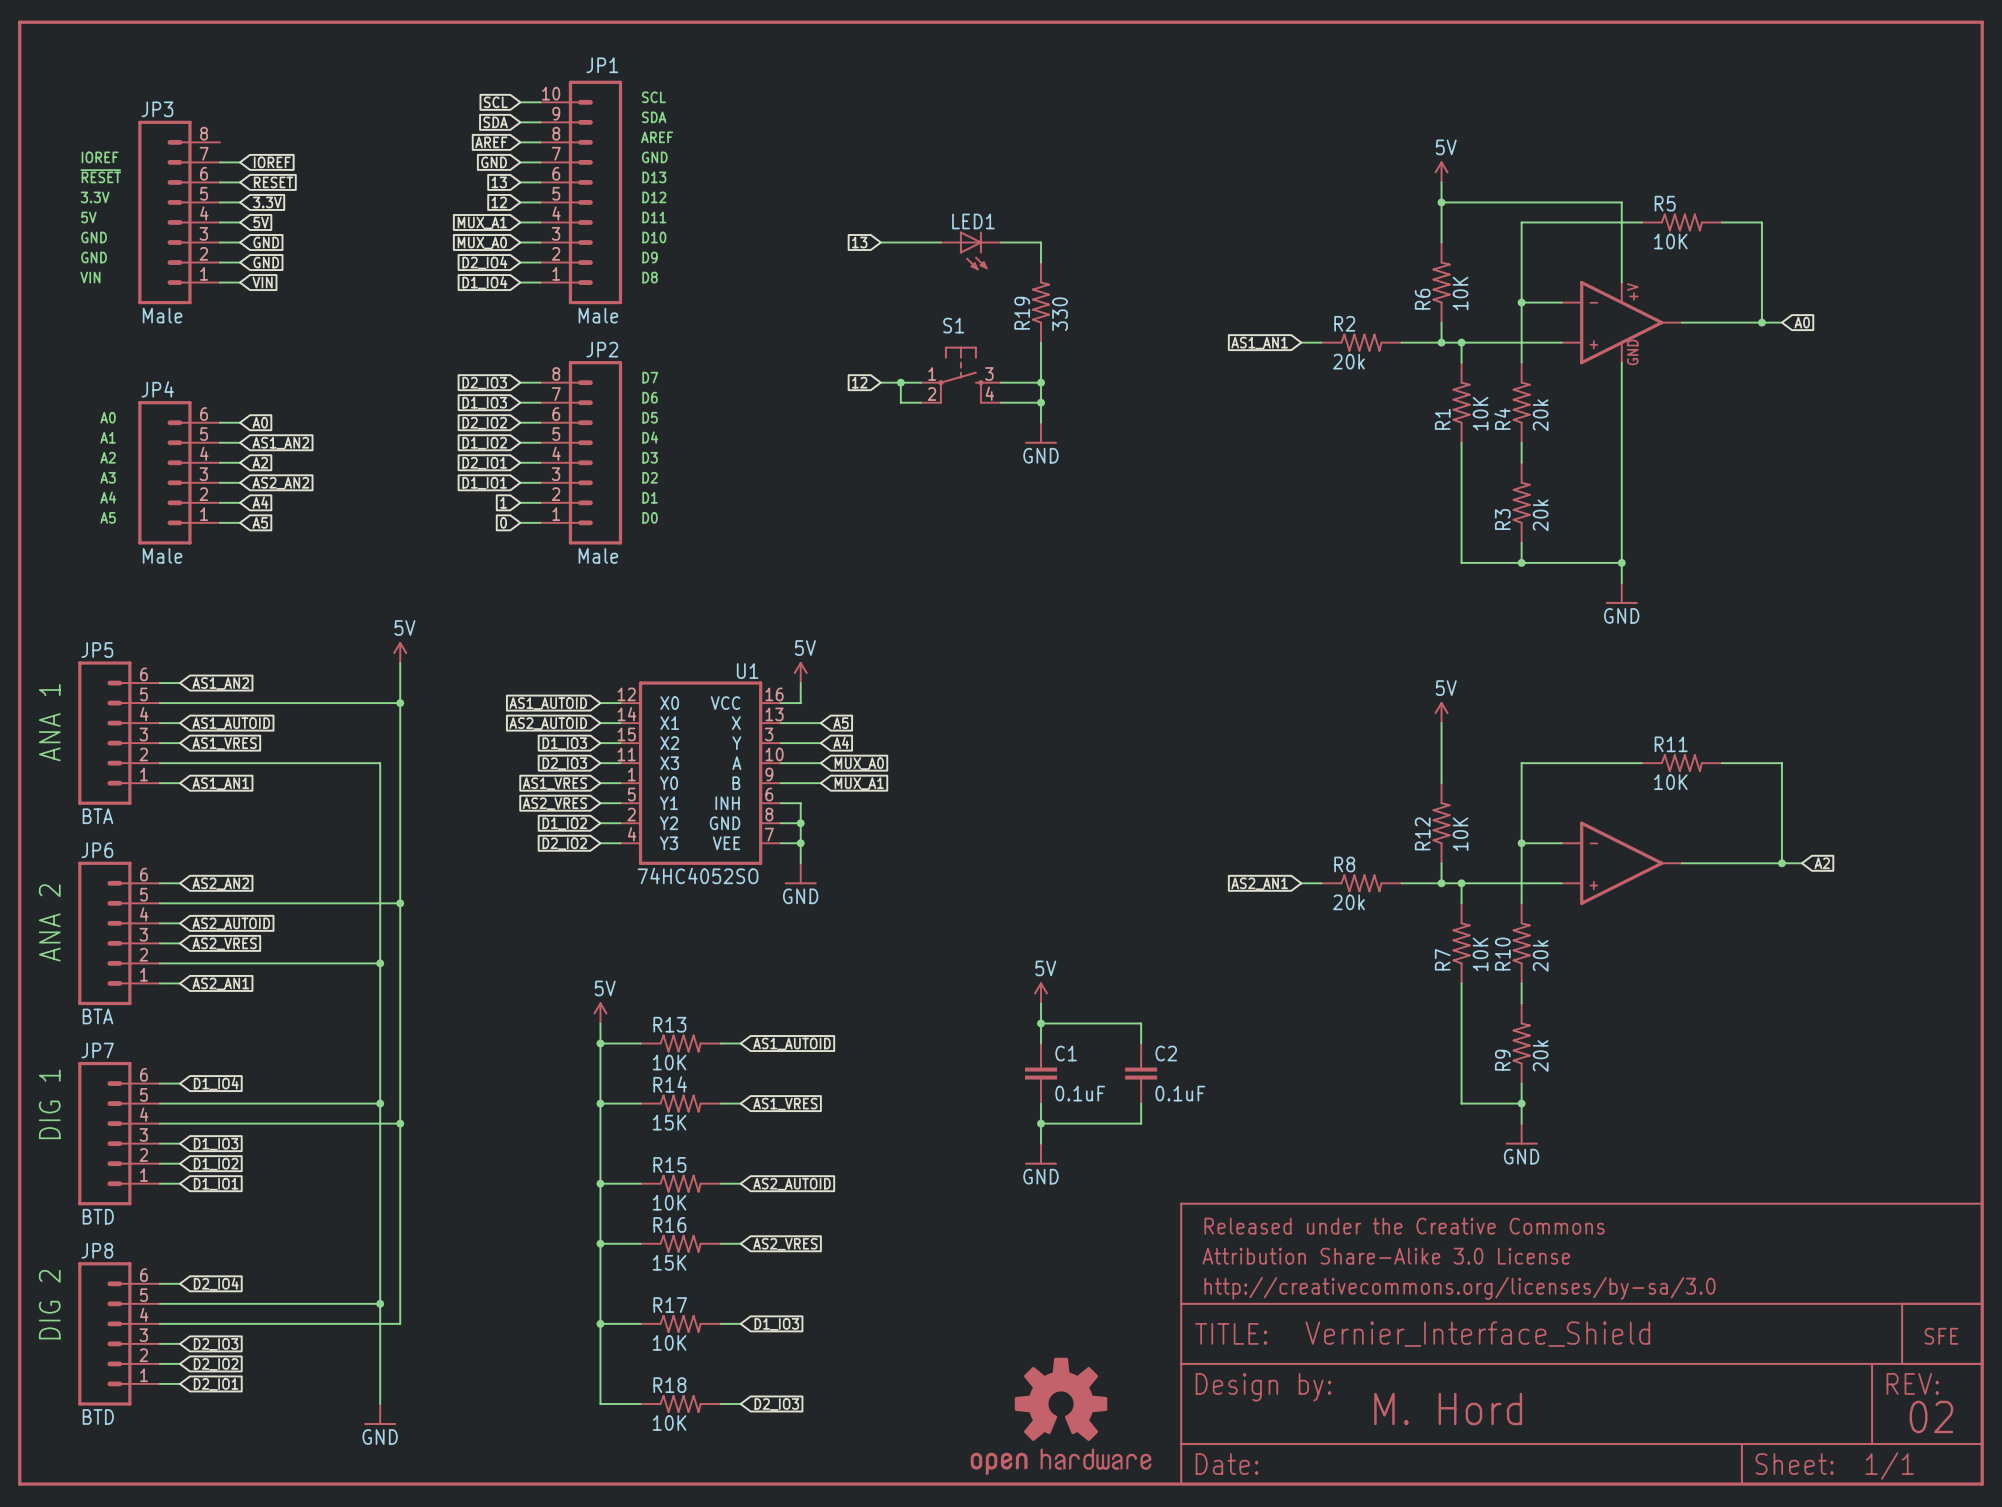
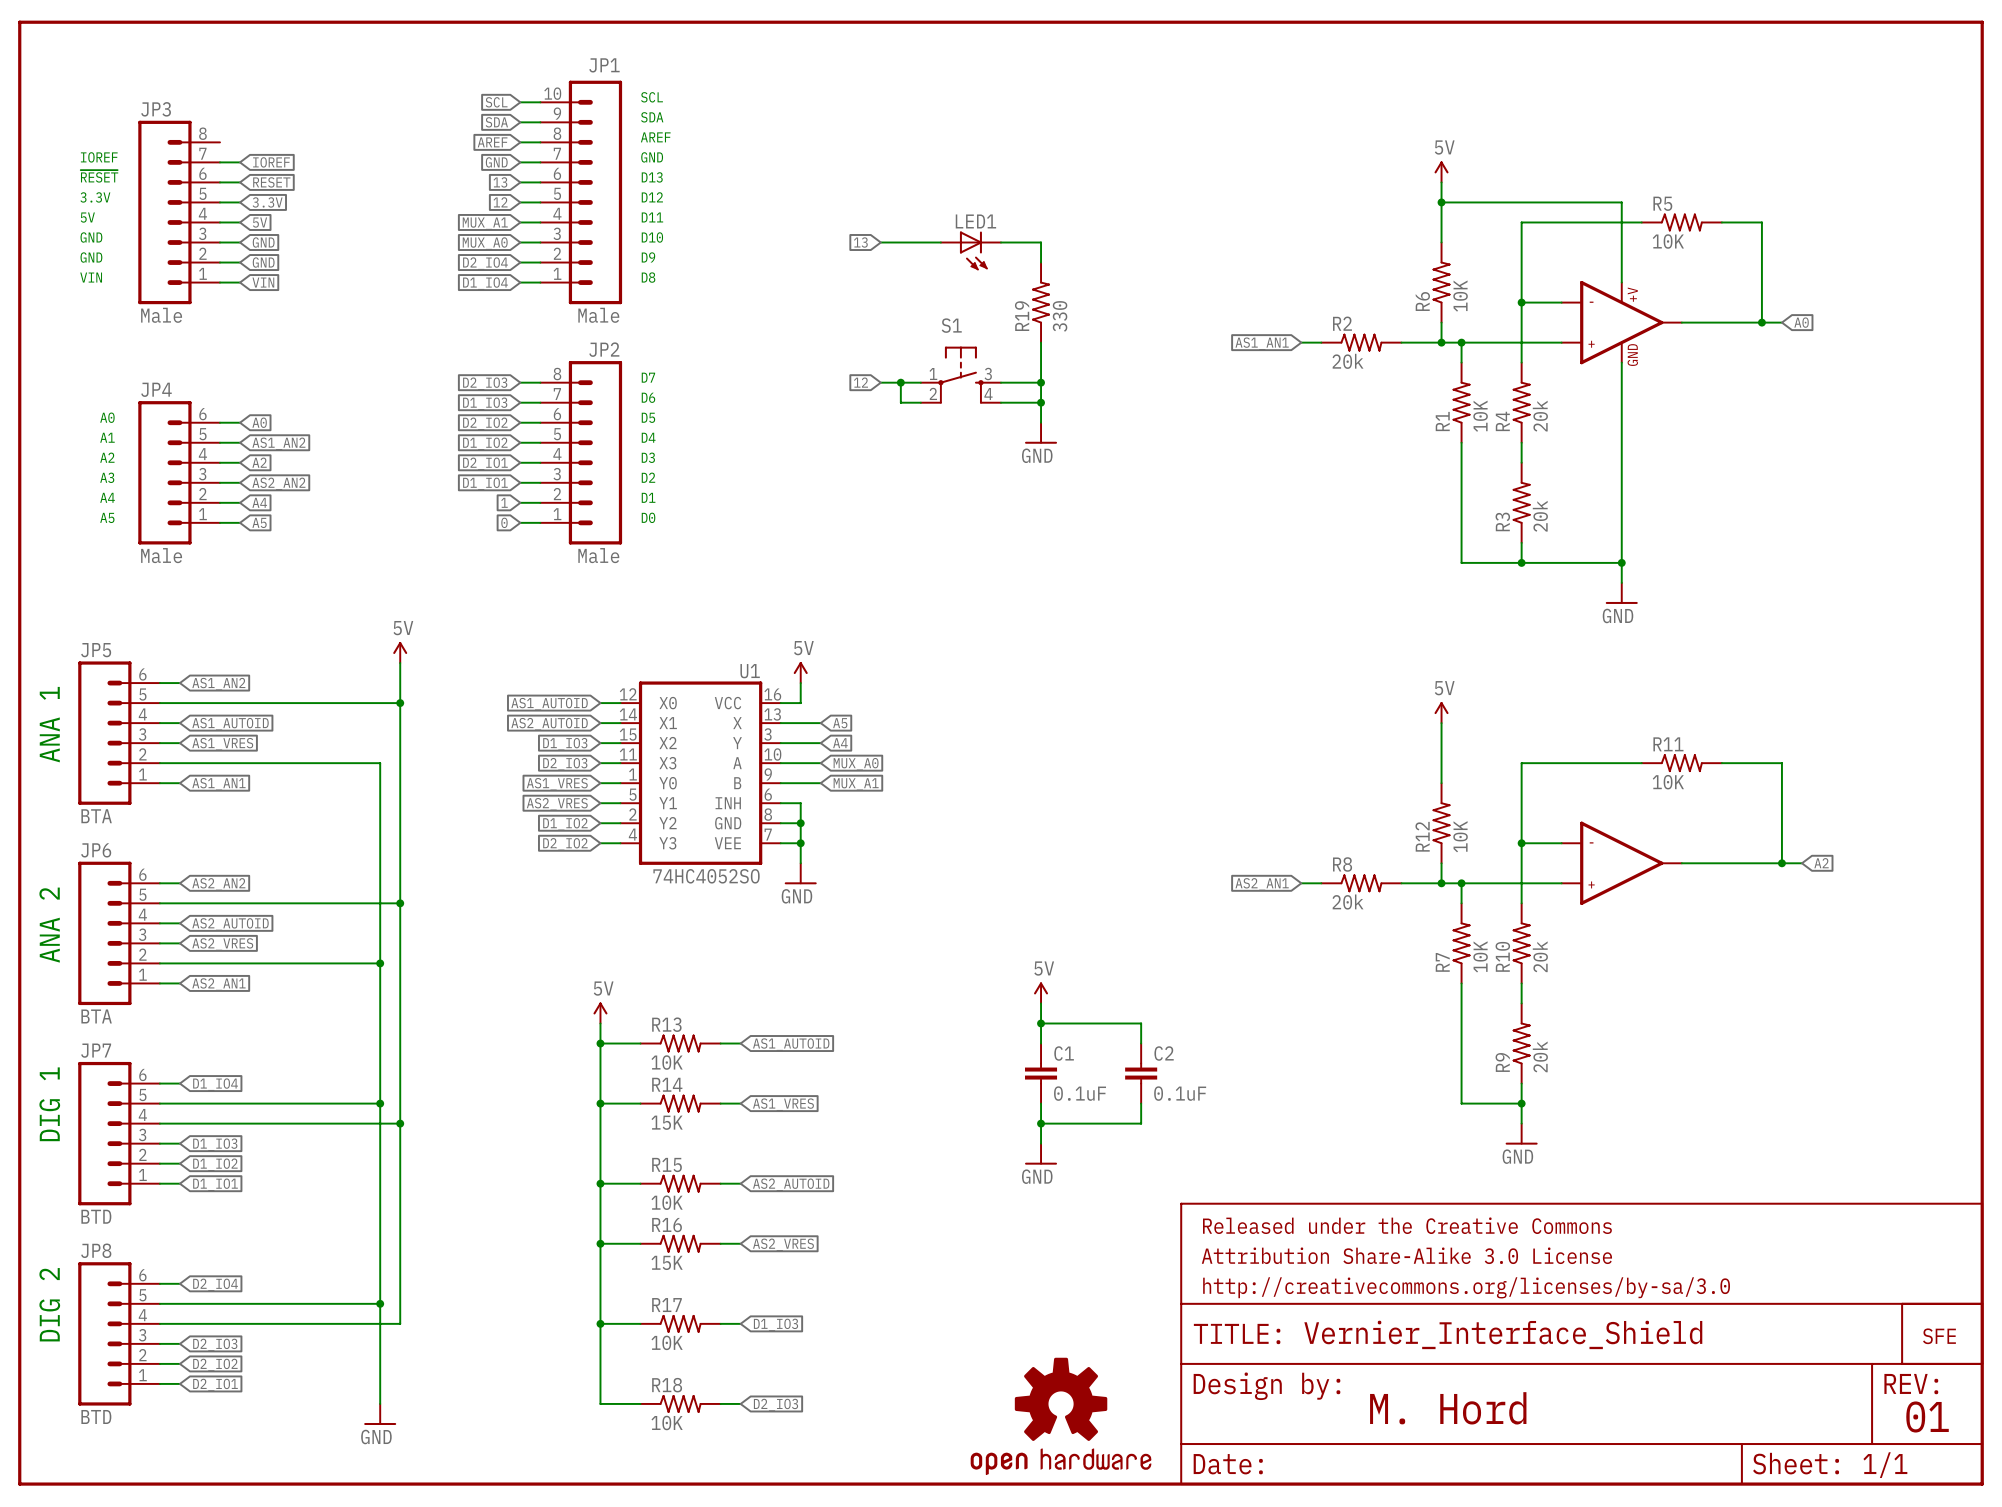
text: 02 (1931, 1416) -> 01 (1927, 1416)

